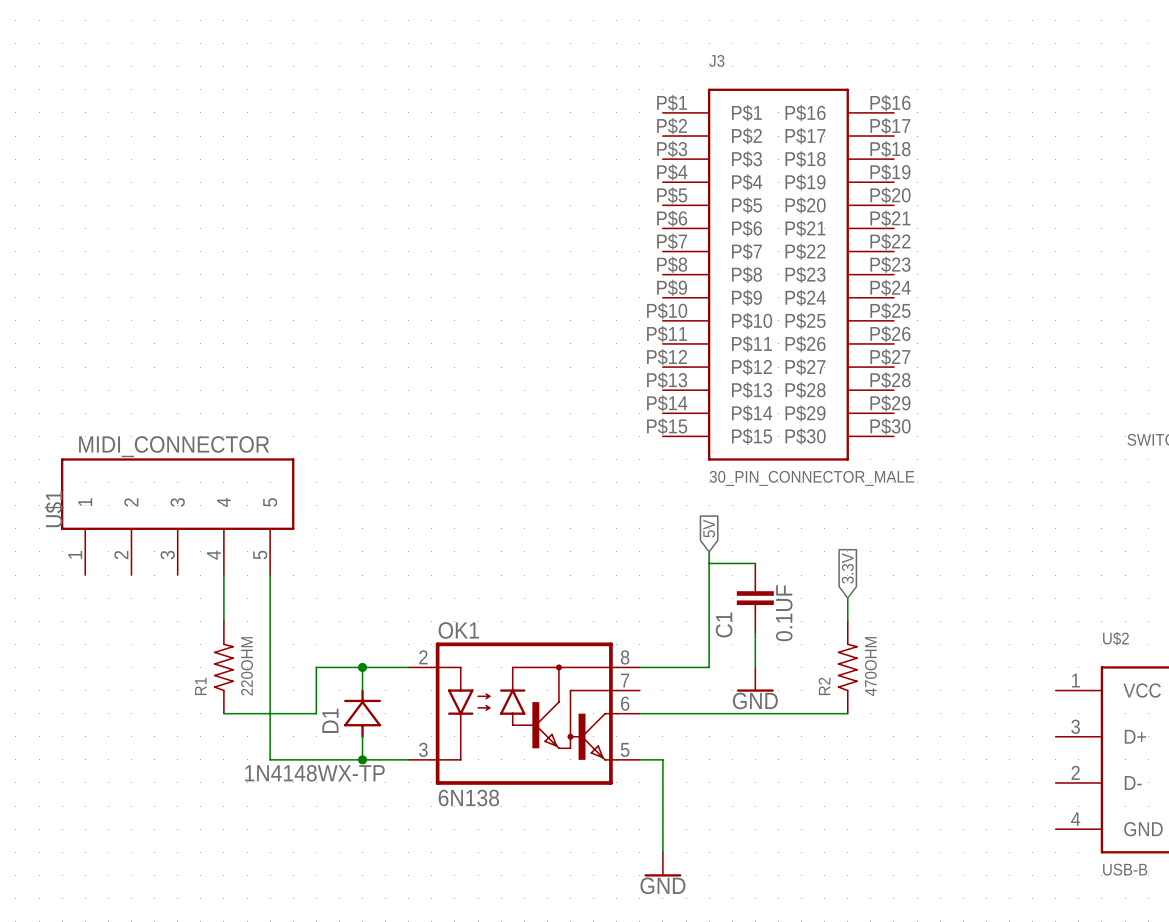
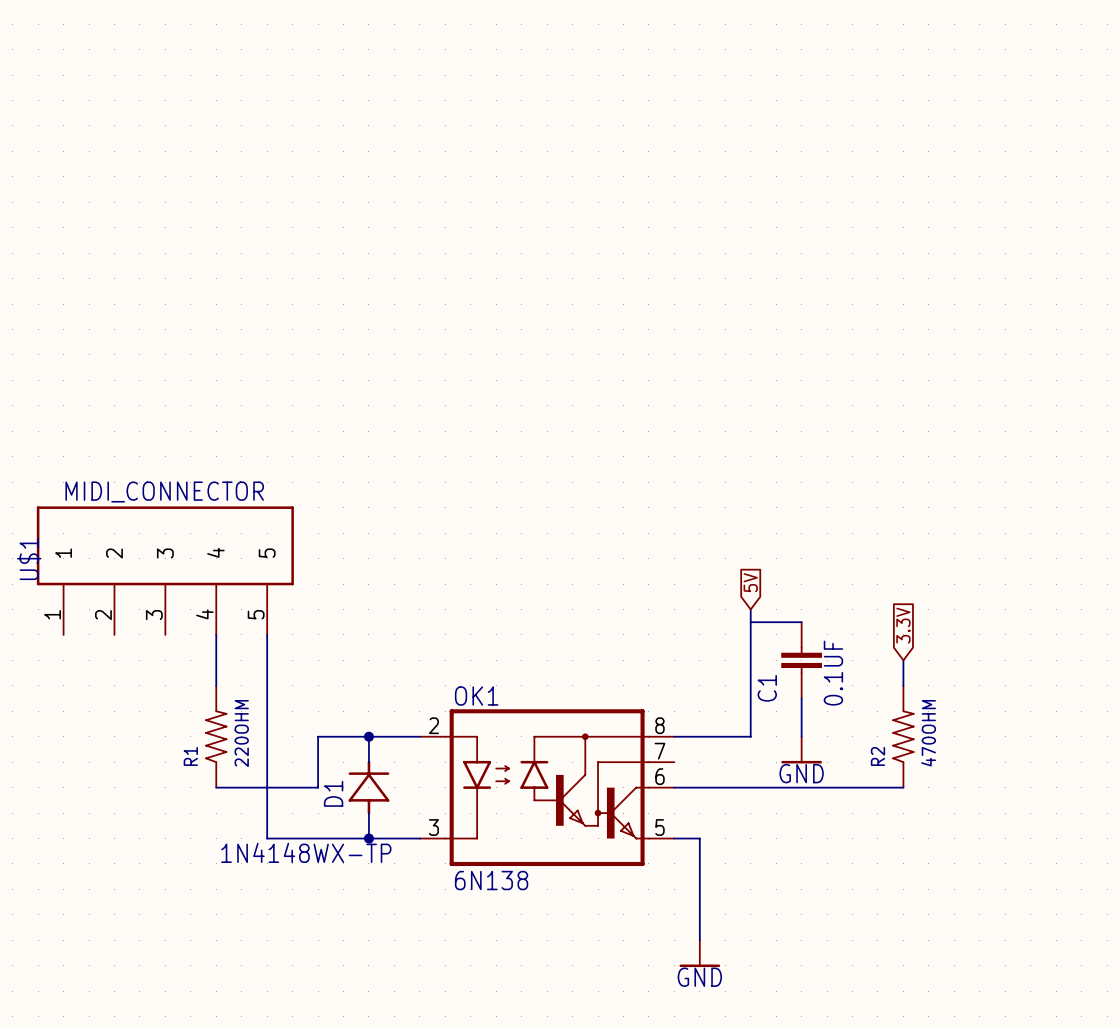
J3: 30_PIN_CONNECTOR_MALE (778, 274) -> none

